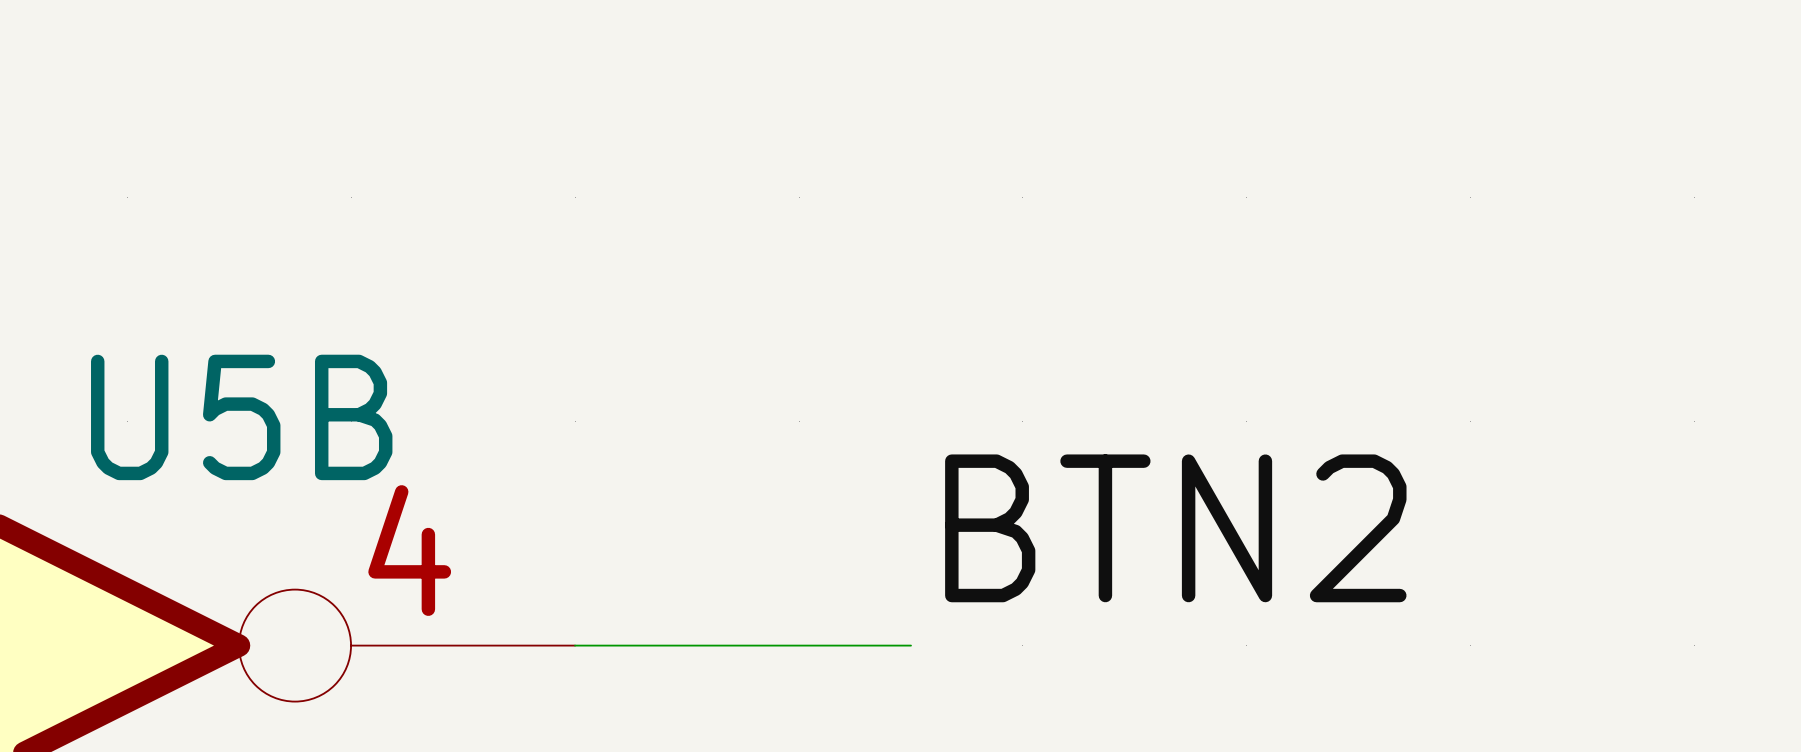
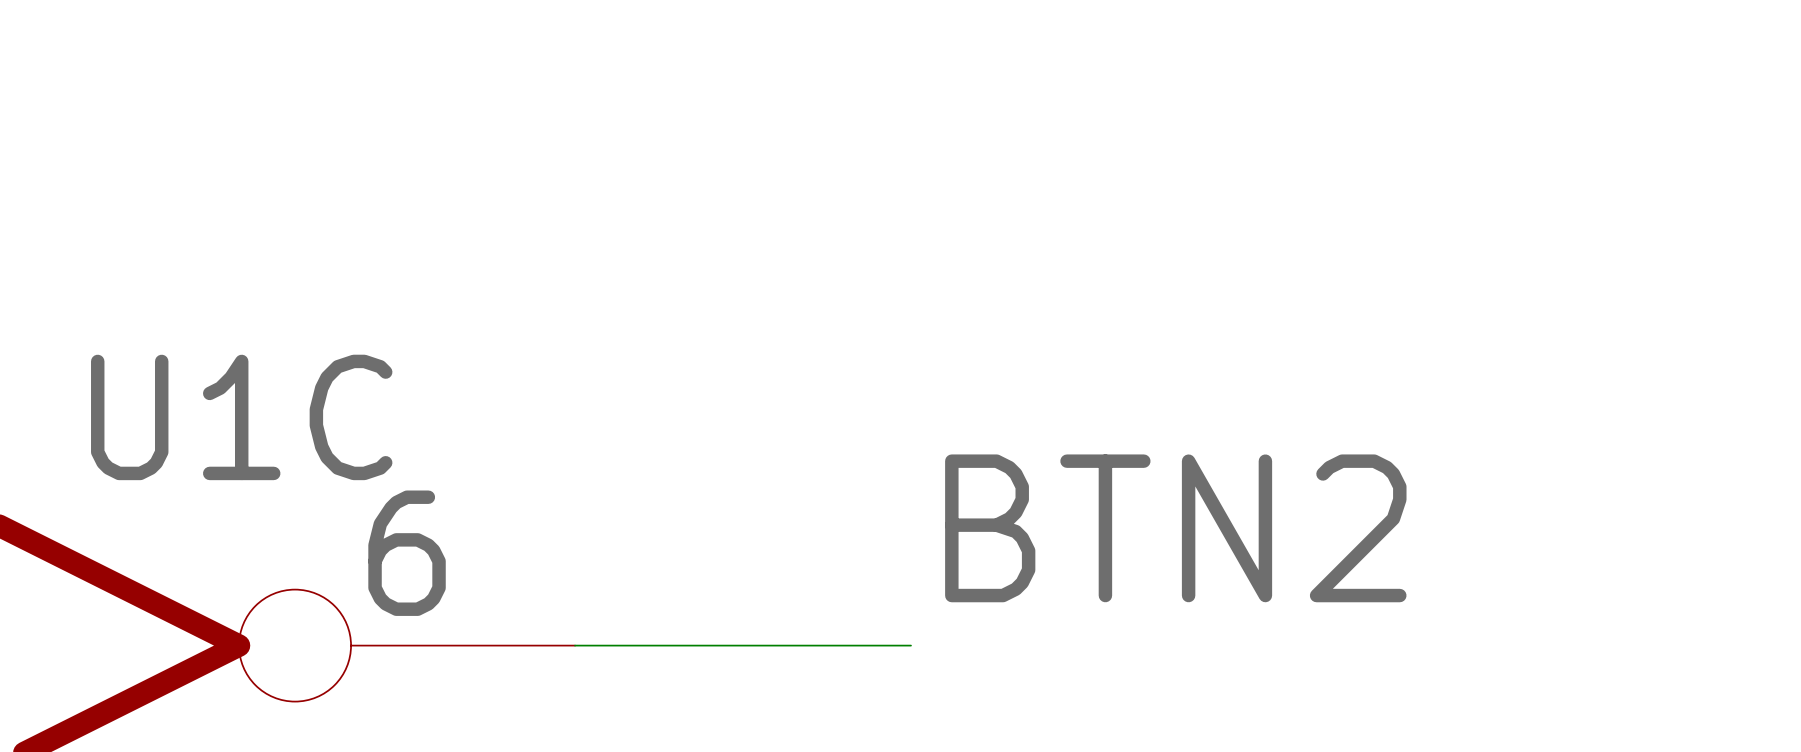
U5B name: U5B (241, 417) -> U1C (241, 417)
U5B pin number: 4 (409, 550) -> 6 (407, 553)

